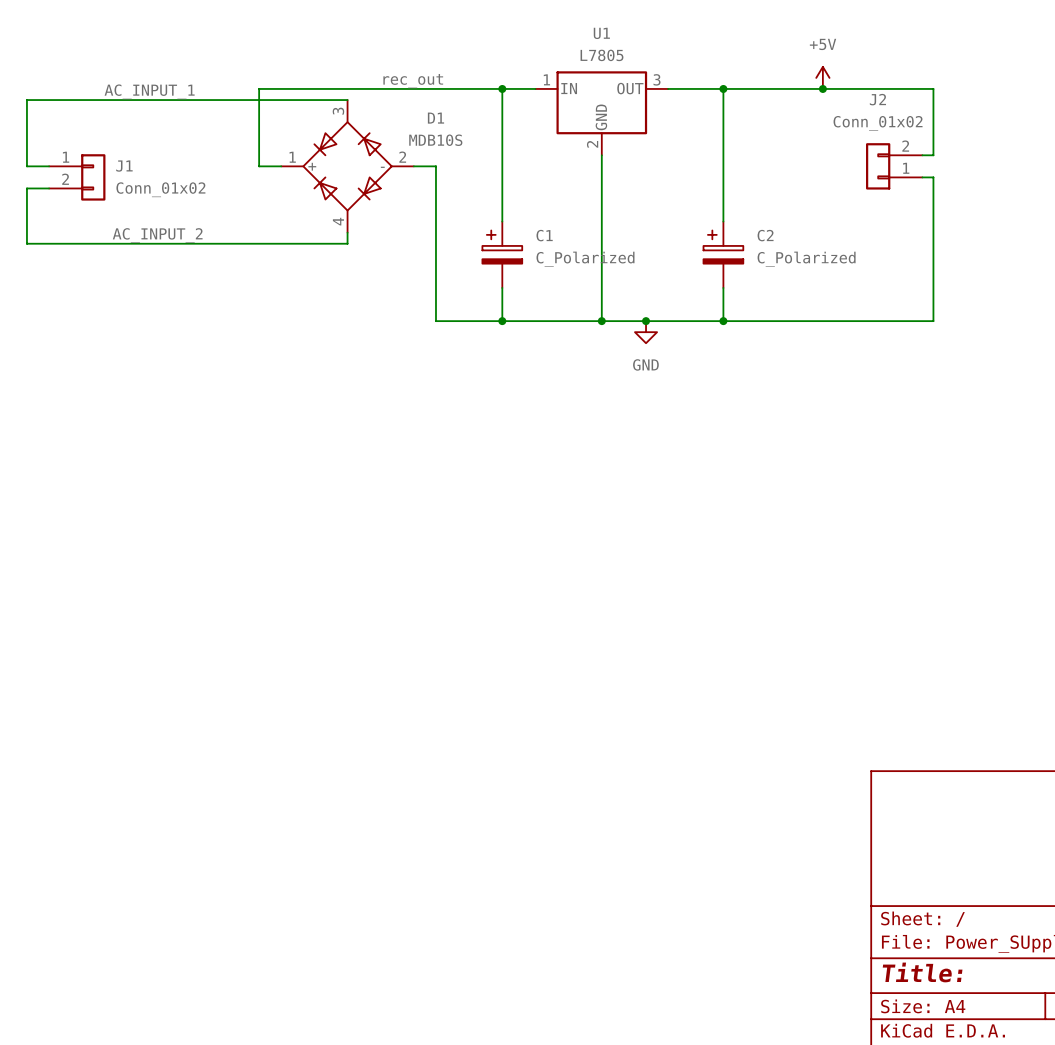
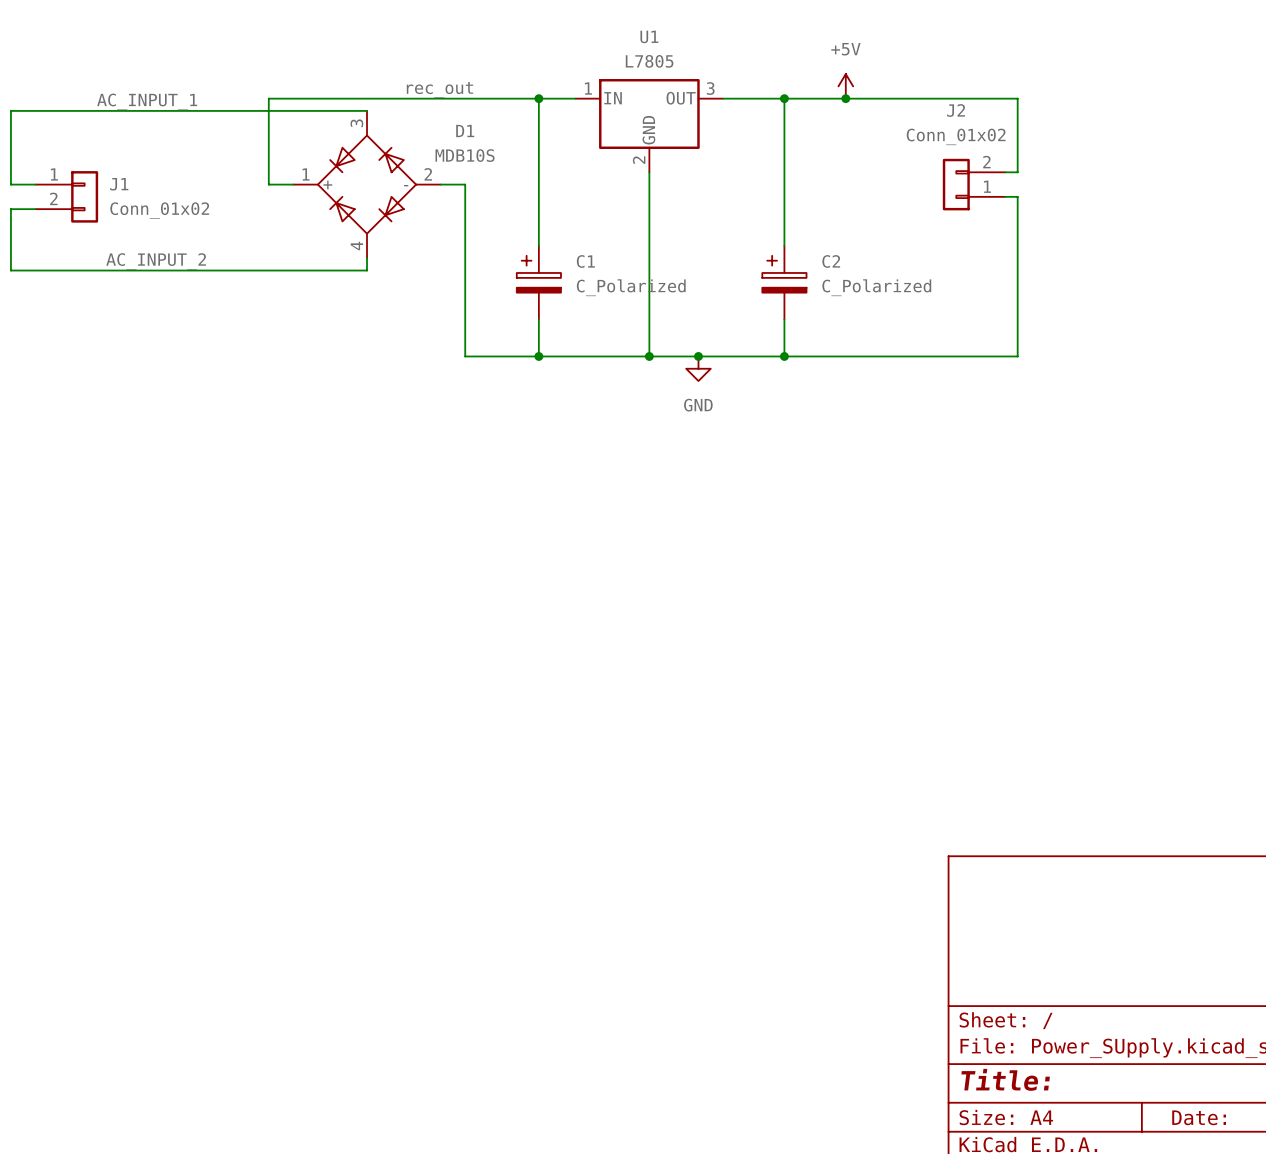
power symbol position: +5V (822, 77) -> +5V (845, 86)
junction position: (822, 88) -> (845, 98)

